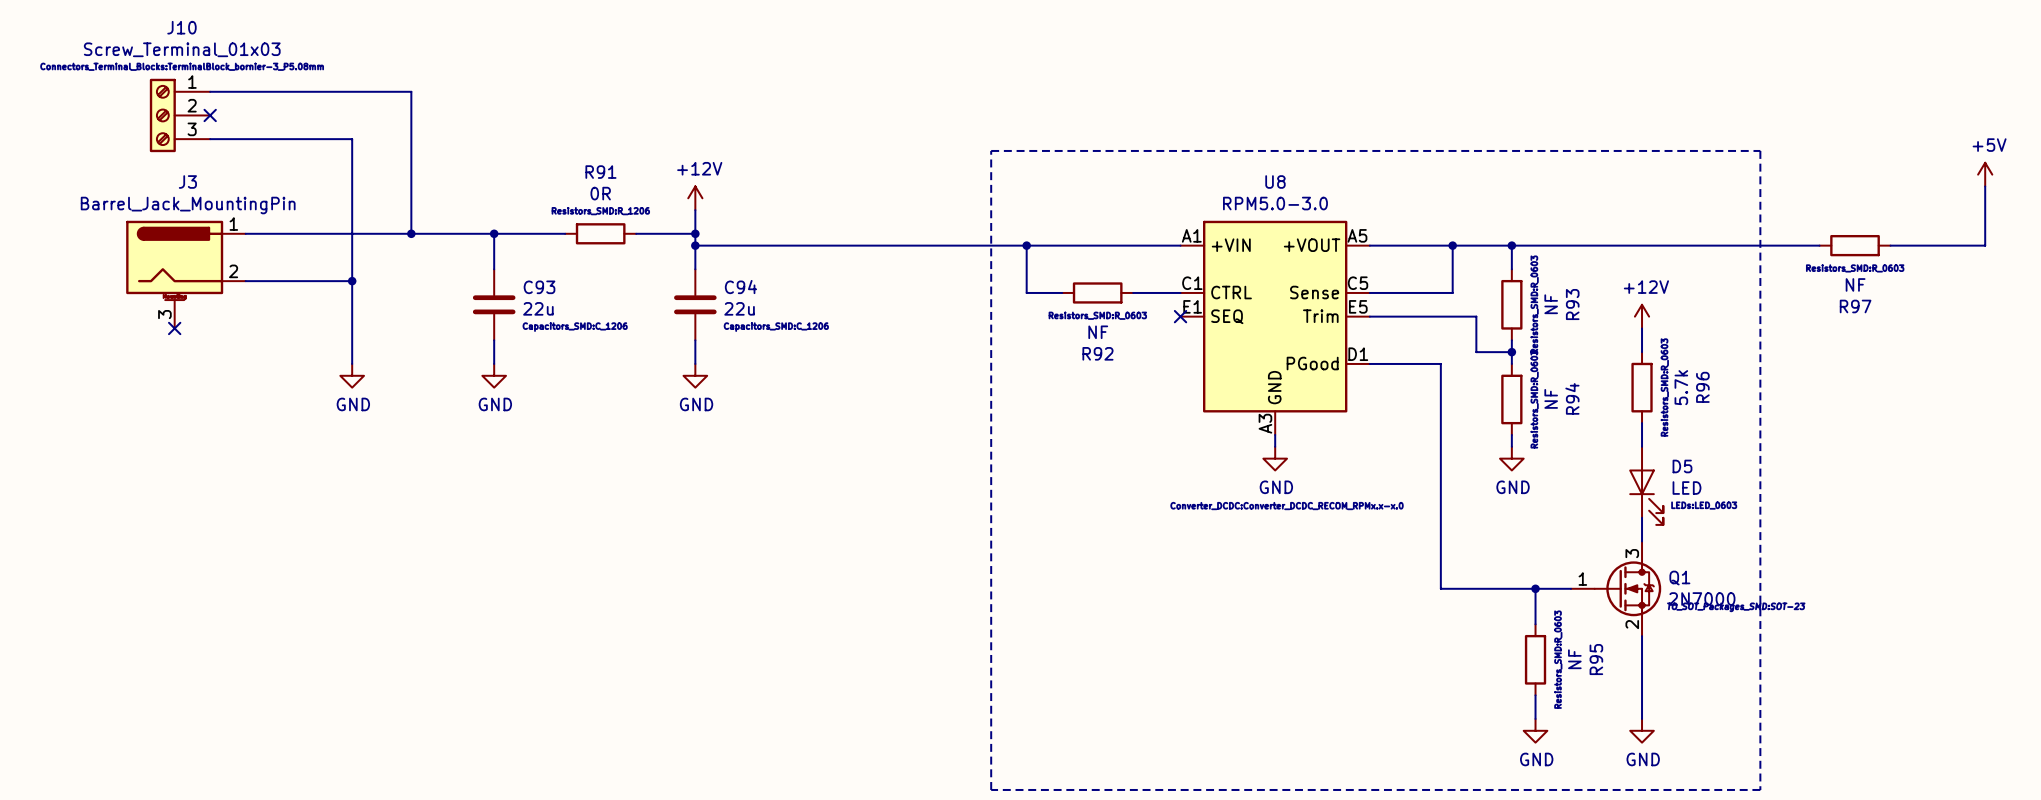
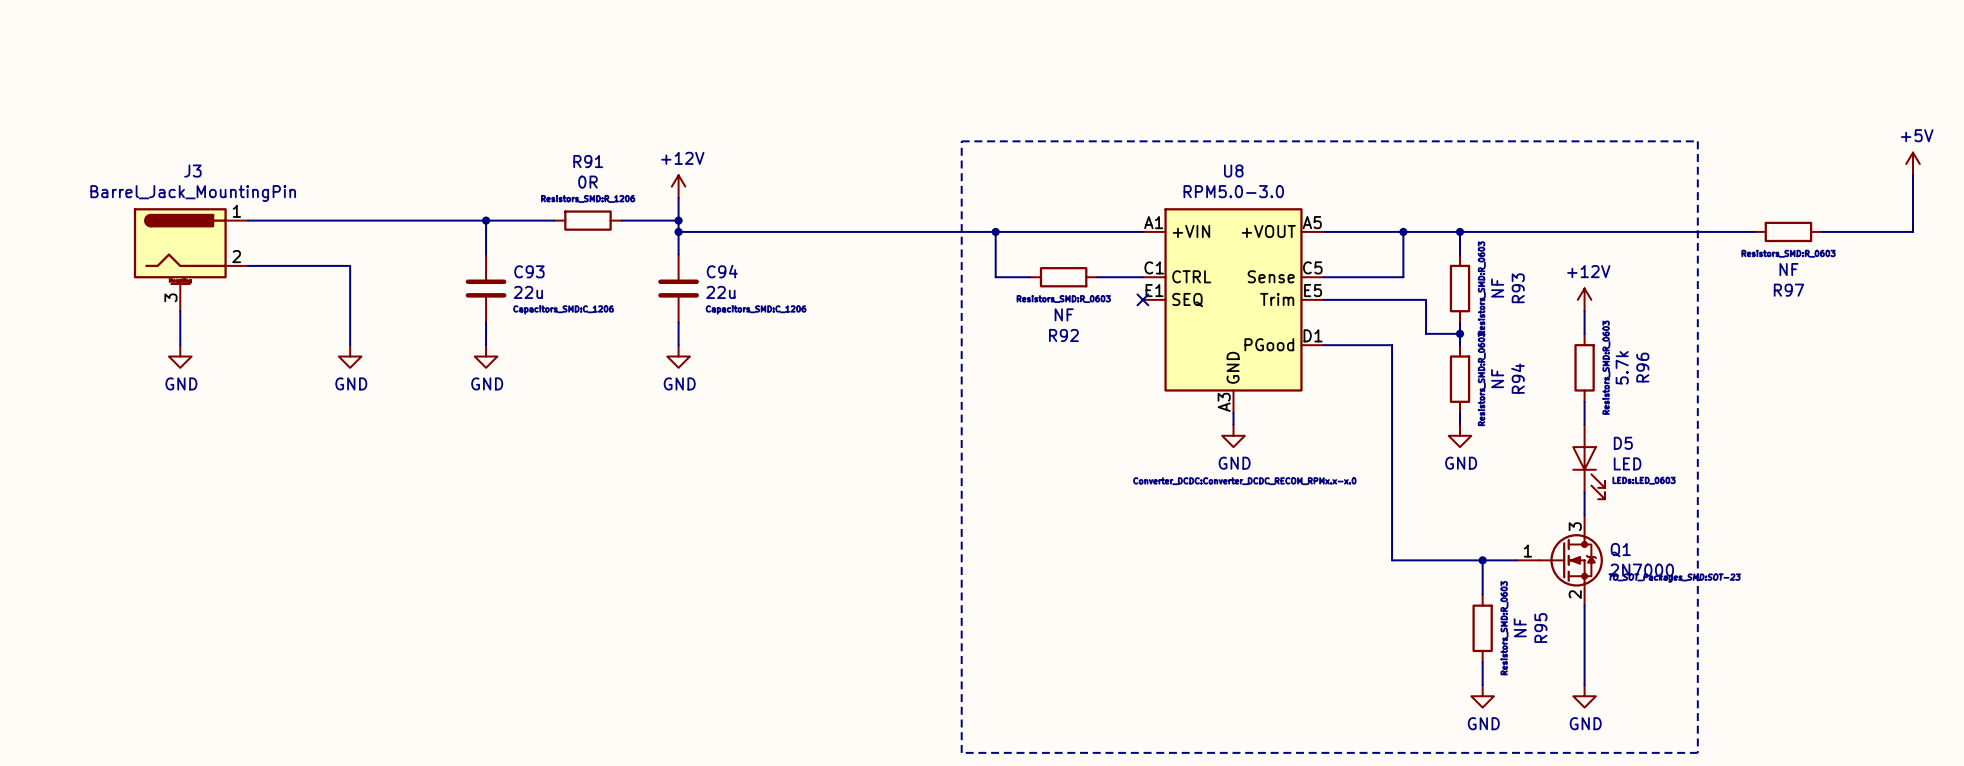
wire: (210, 91) (411, 91) (411, 233) -> none
J10: Screw_Terminal_01x03 (180, 115) -> none
no-connect mark: (210, 115) -> none
wire: (210, 139) (352, 139) (352, 281) -> none
junction: (411, 233) -> none
junction: (352, 281) -> none
wire: none -> (180, 311) (180, 345)
no-connect mark: (174, 328) -> none
power symbol: none -> GND (180, 356)

